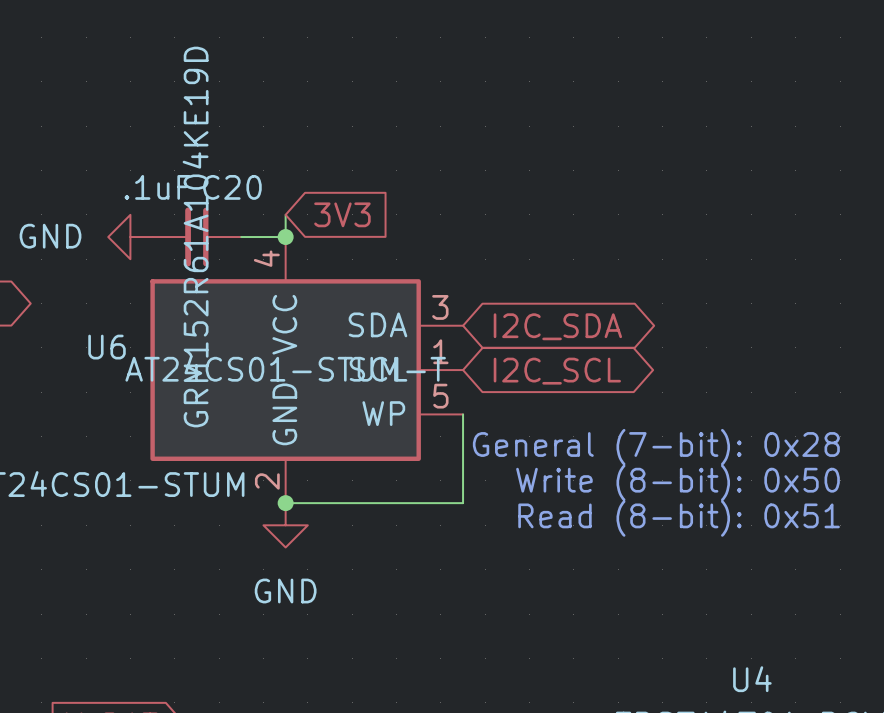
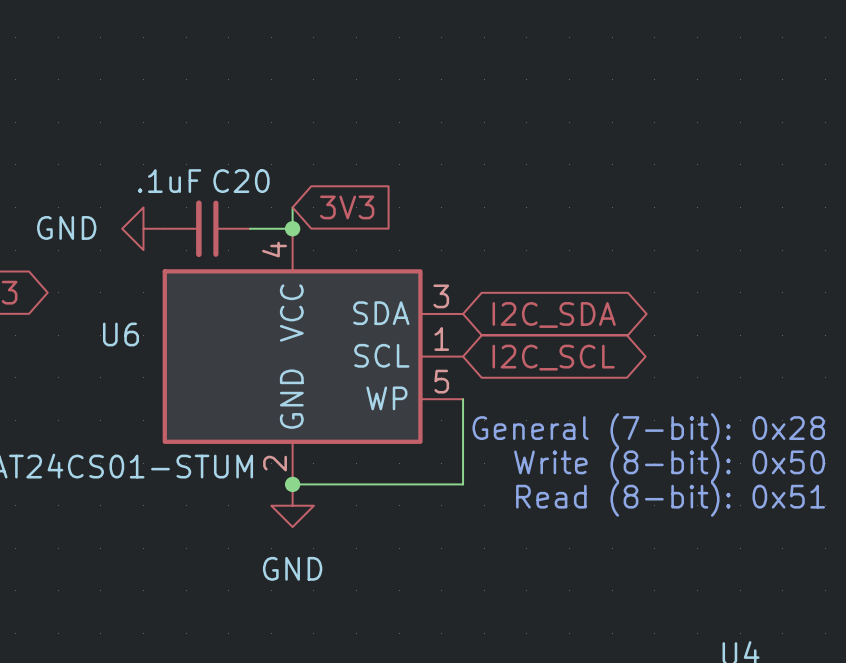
C20 text: GRM152R61A104KE19D (195, 237) -> none
U6 text: AT24CS01-STUM-T (285, 368) -> none

